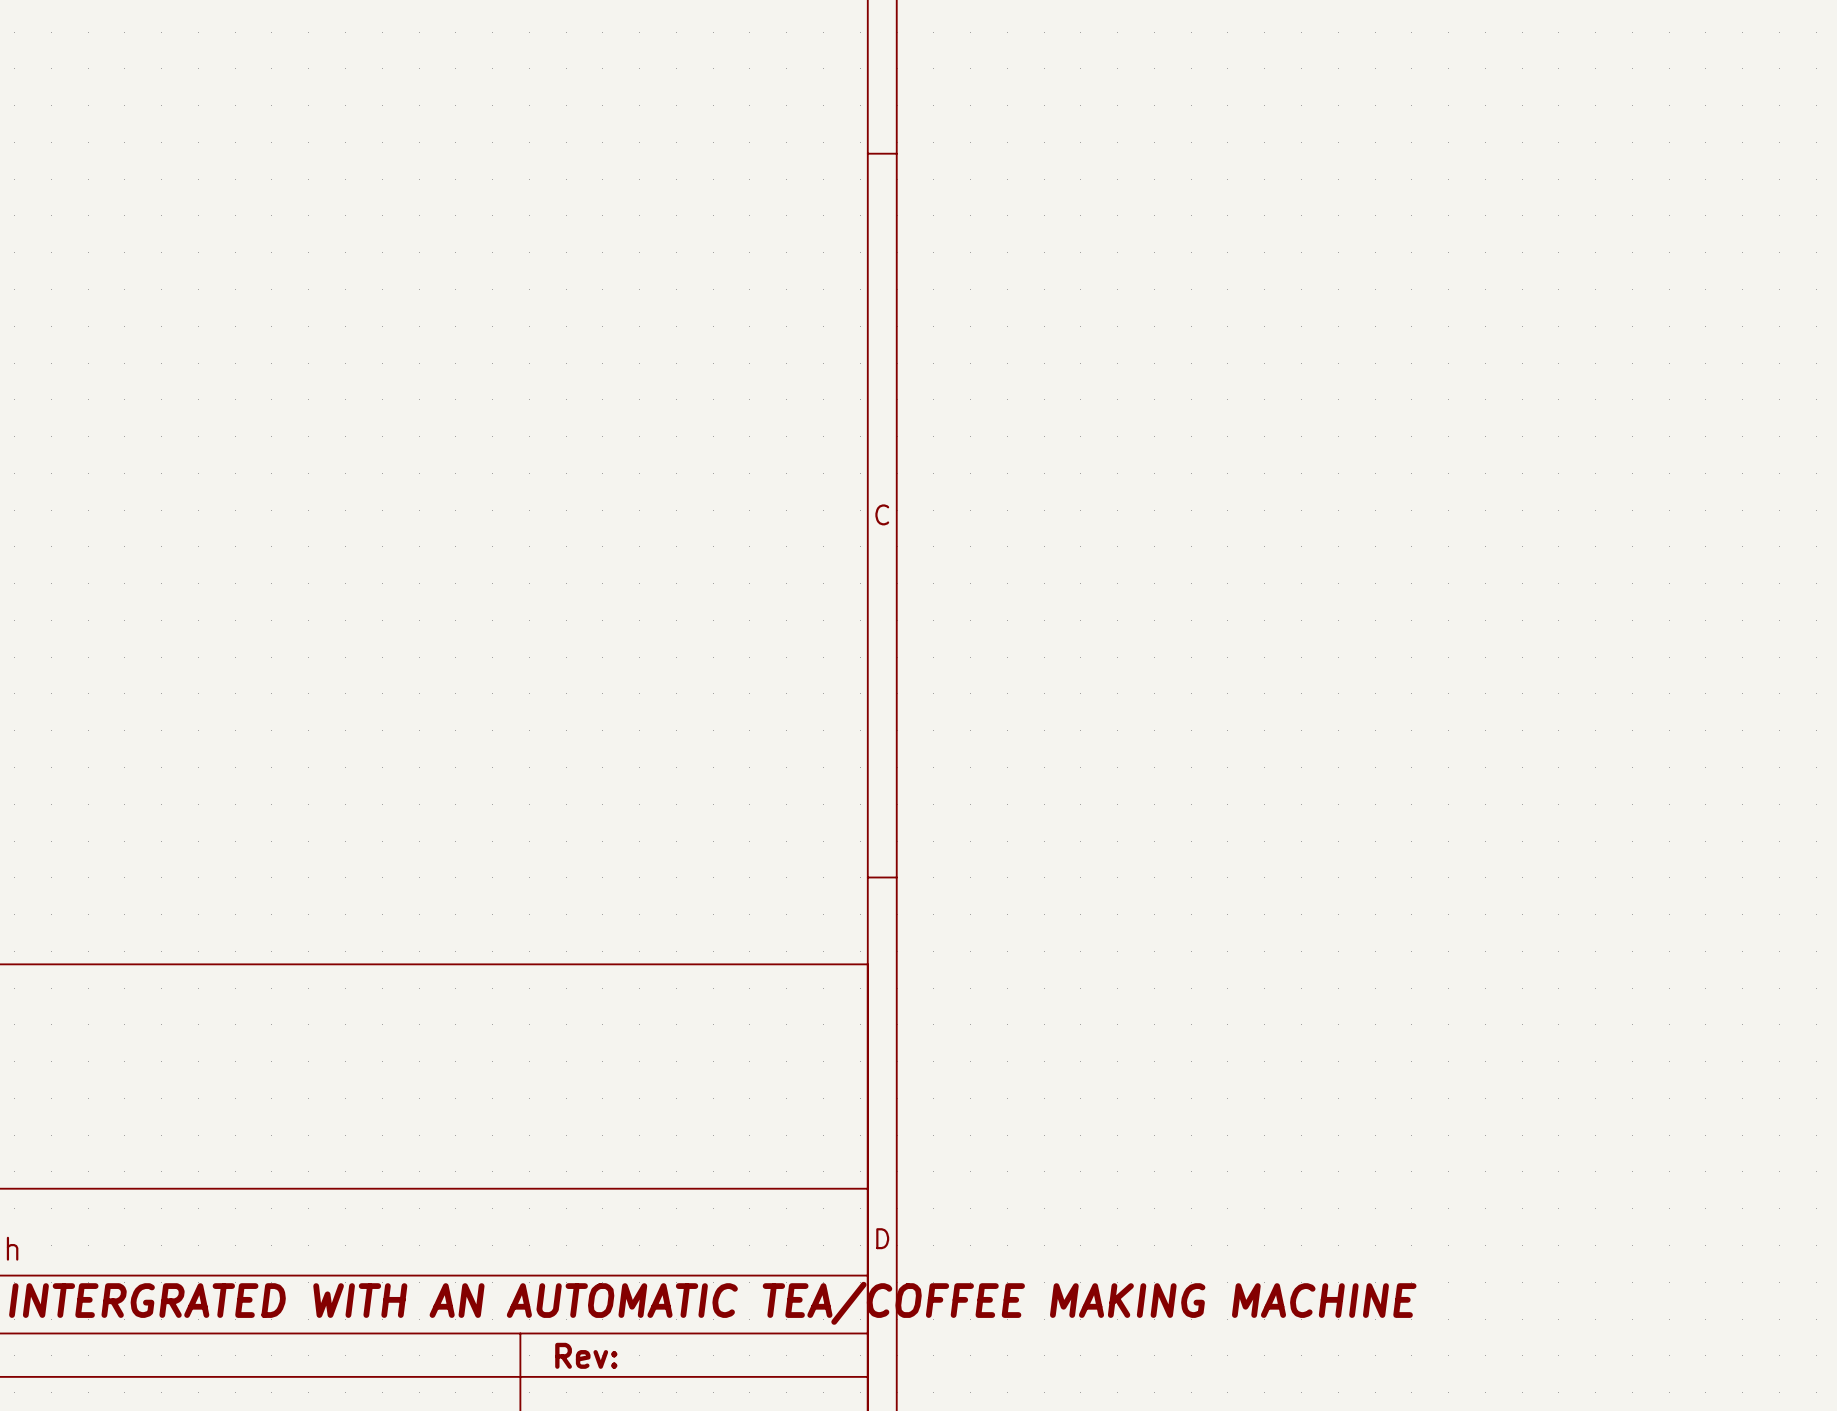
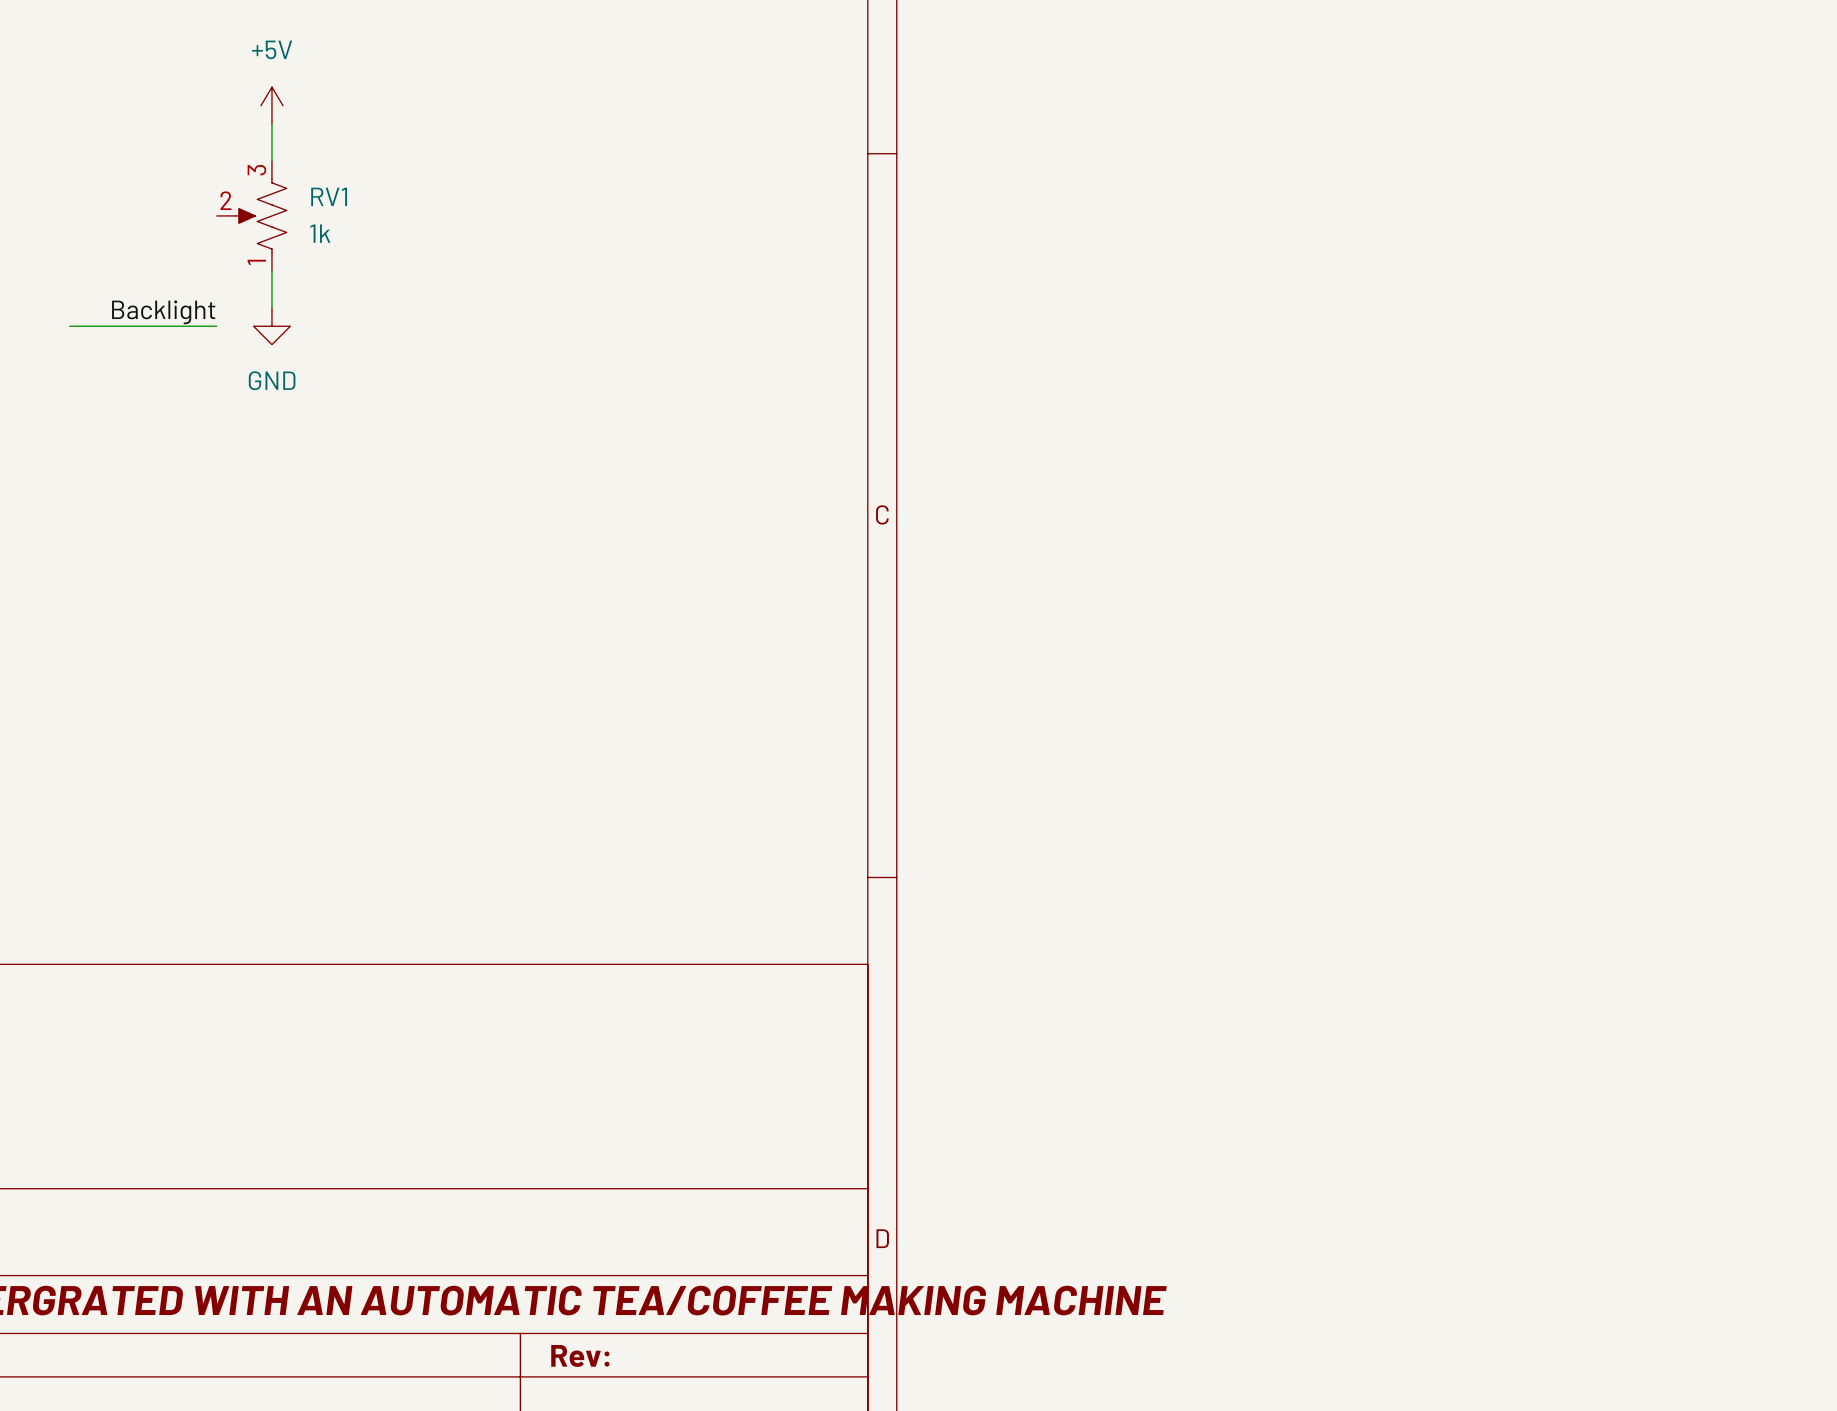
power symbol: none -> +5V (271, 105)
wire: none -> (271, 124) (271, 160)
RV1: none -> 1k (251, 215)
wire: none -> (271, 271) (271, 307)
label: none -> Backlight (163, 312)
wire: none -> (69, 326) (216, 326)
power symbol: none -> GND (271, 326)

